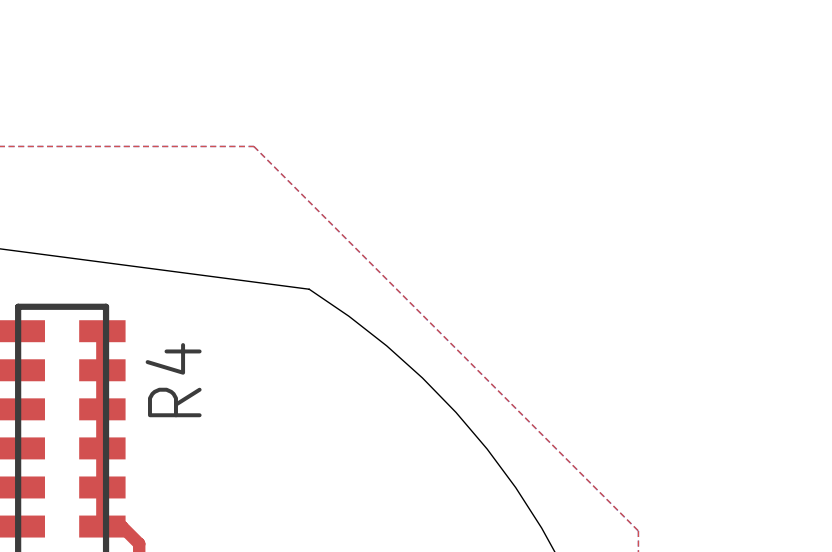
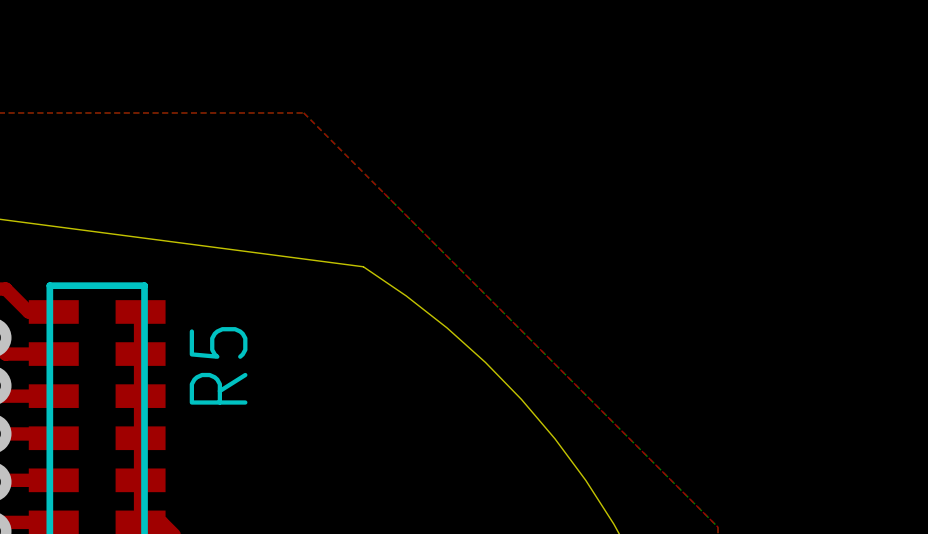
R4 name: R4 (173, 380) -> R5 (218, 365)

